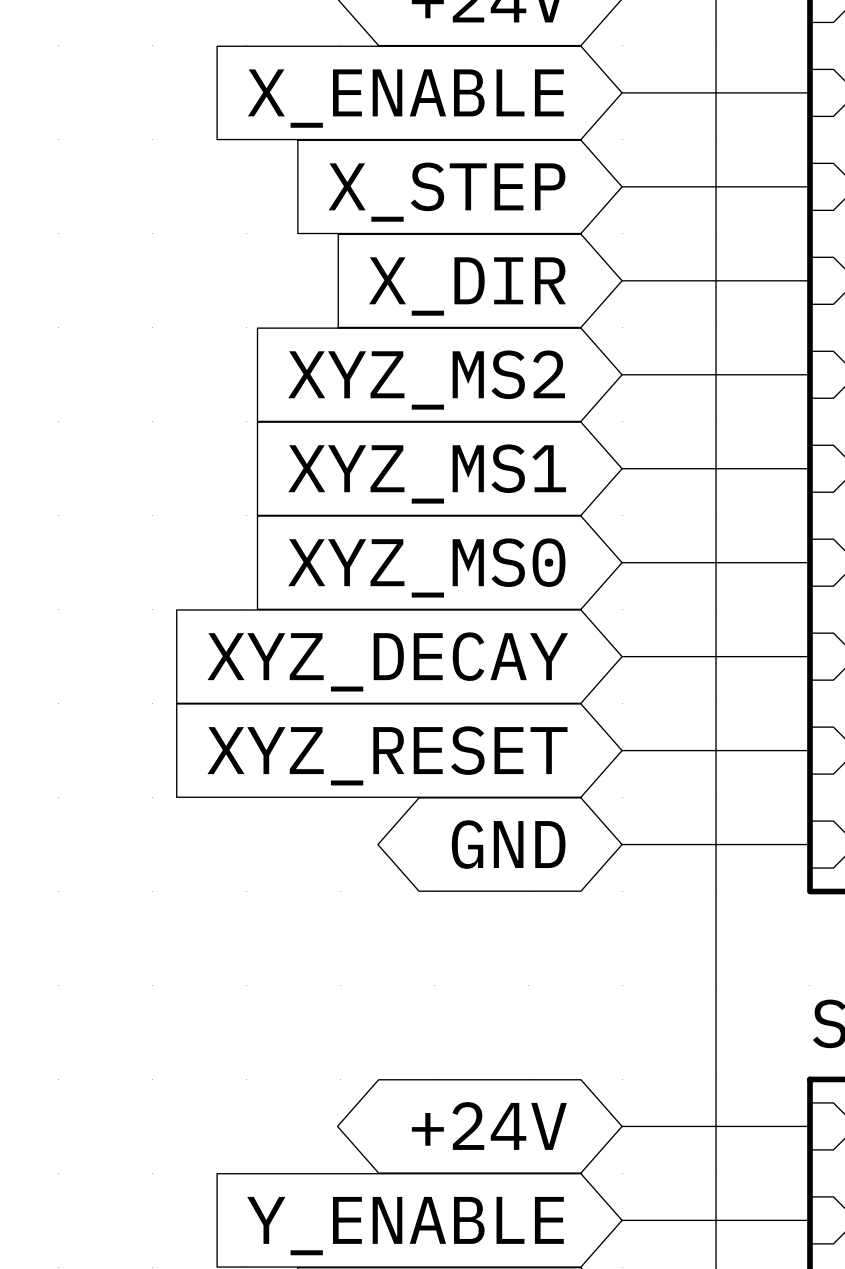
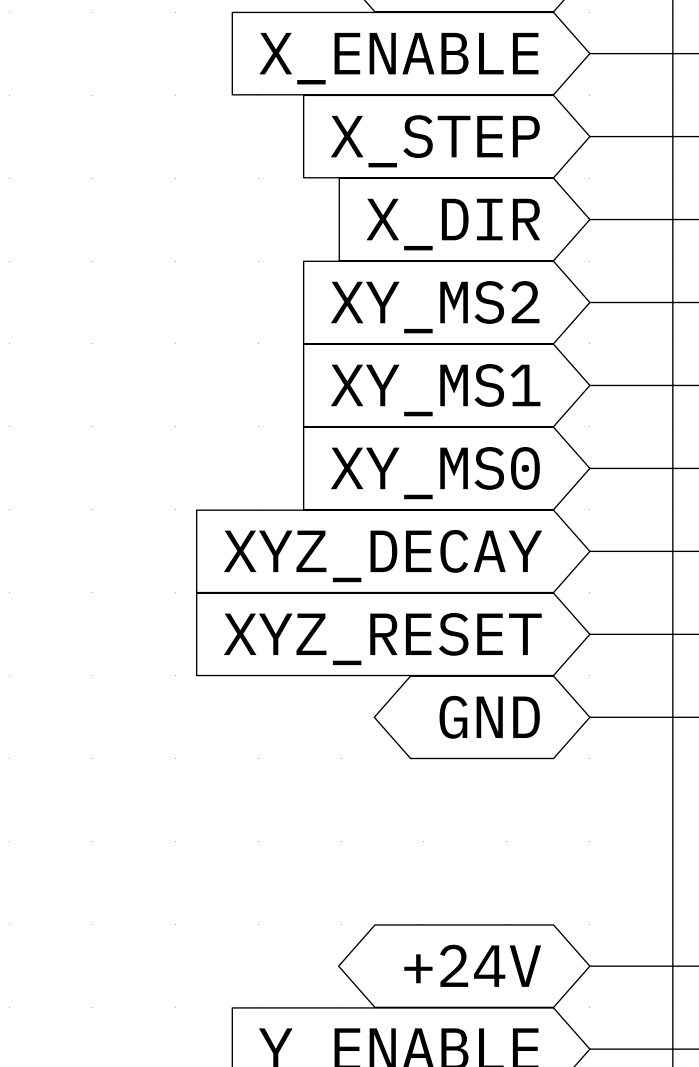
global label: XYZ_MS2 (426, 380) -> XY_MS2 (435, 307)
global label: XYZ_MS1 (427, 474) -> XY_MS1 (435, 390)
global label: XYZ_MS0 (426, 567) -> XY_MS0 (435, 473)

